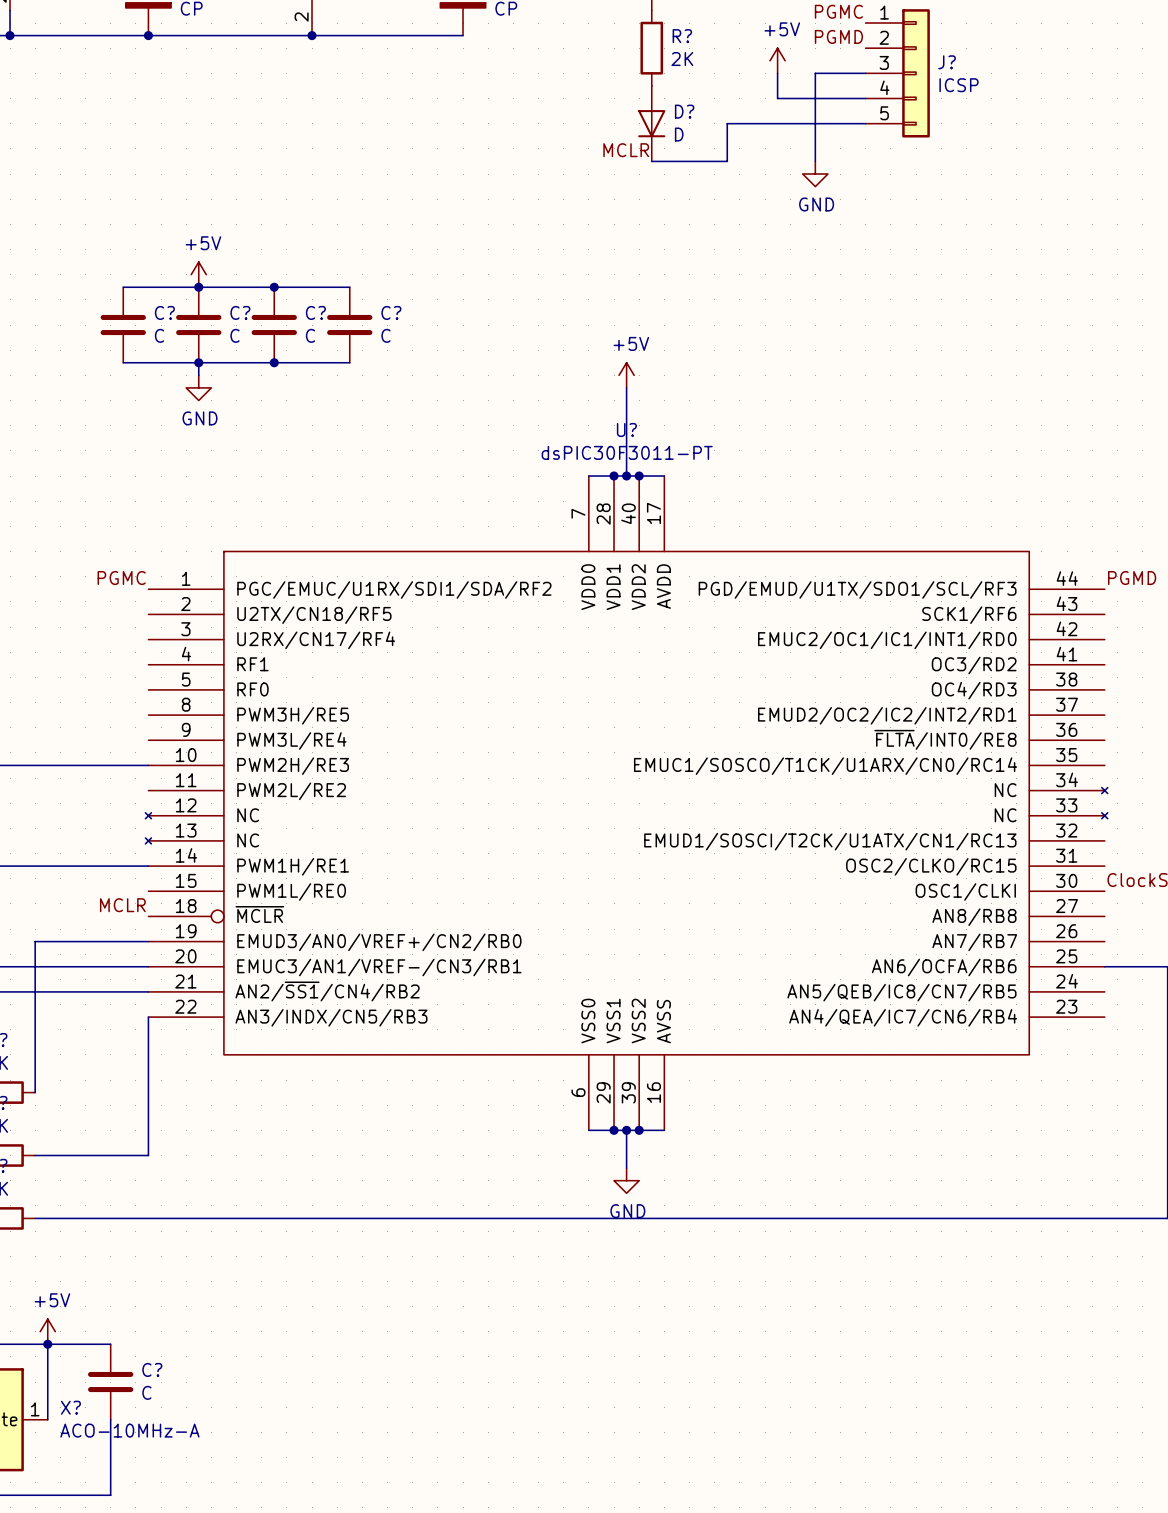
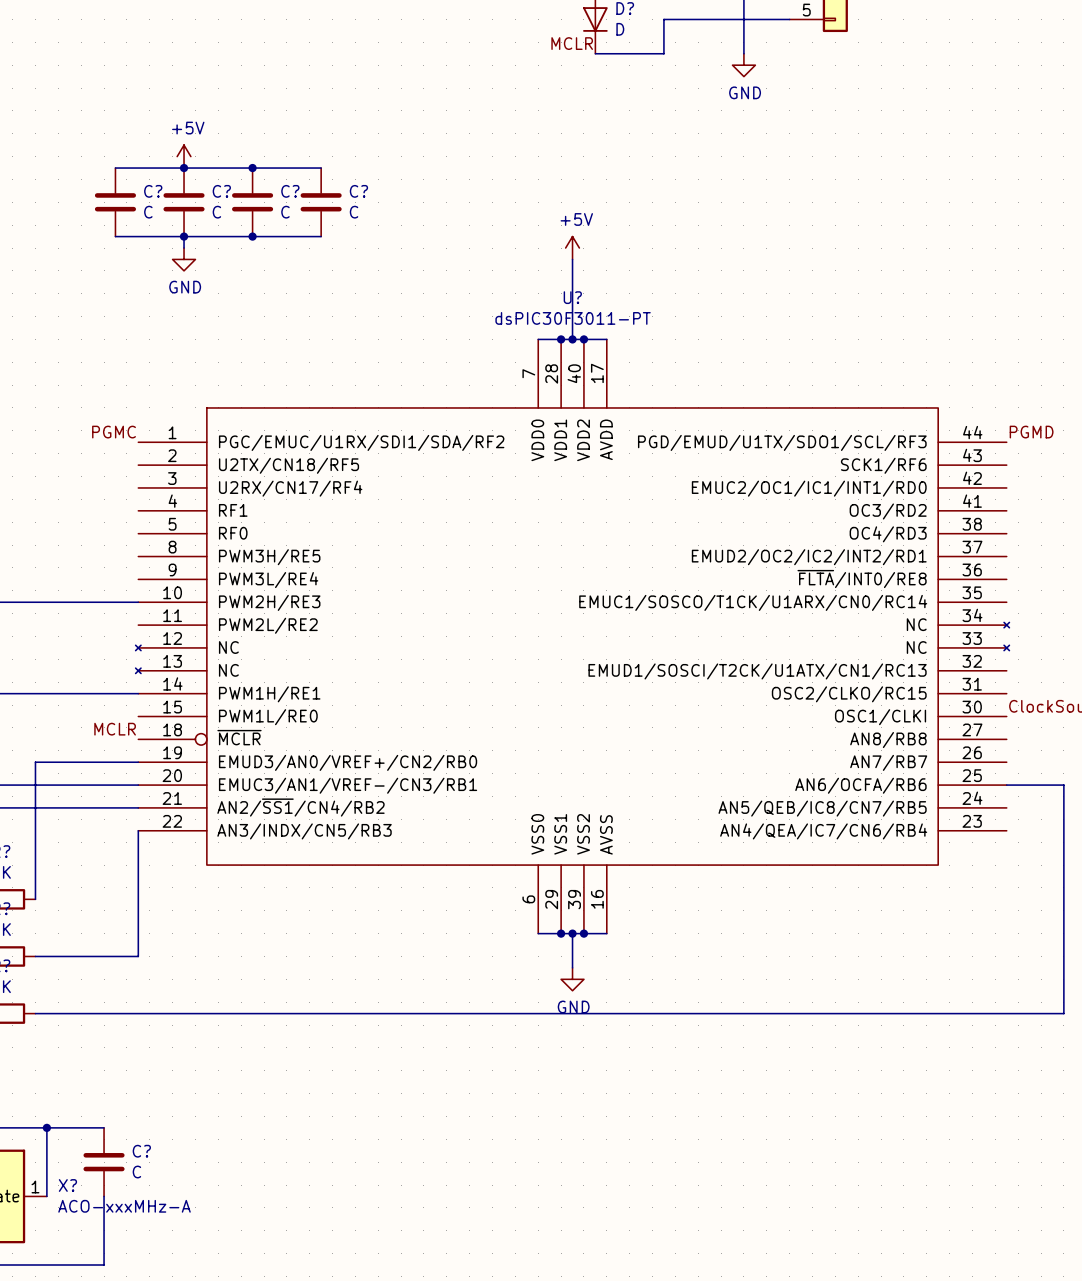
power symbol: +5V (47, 1331) -> none
X? value: ACO-10MHz-A (129, 1430) -> ACO-xxxMHz-A (124, 1206)

